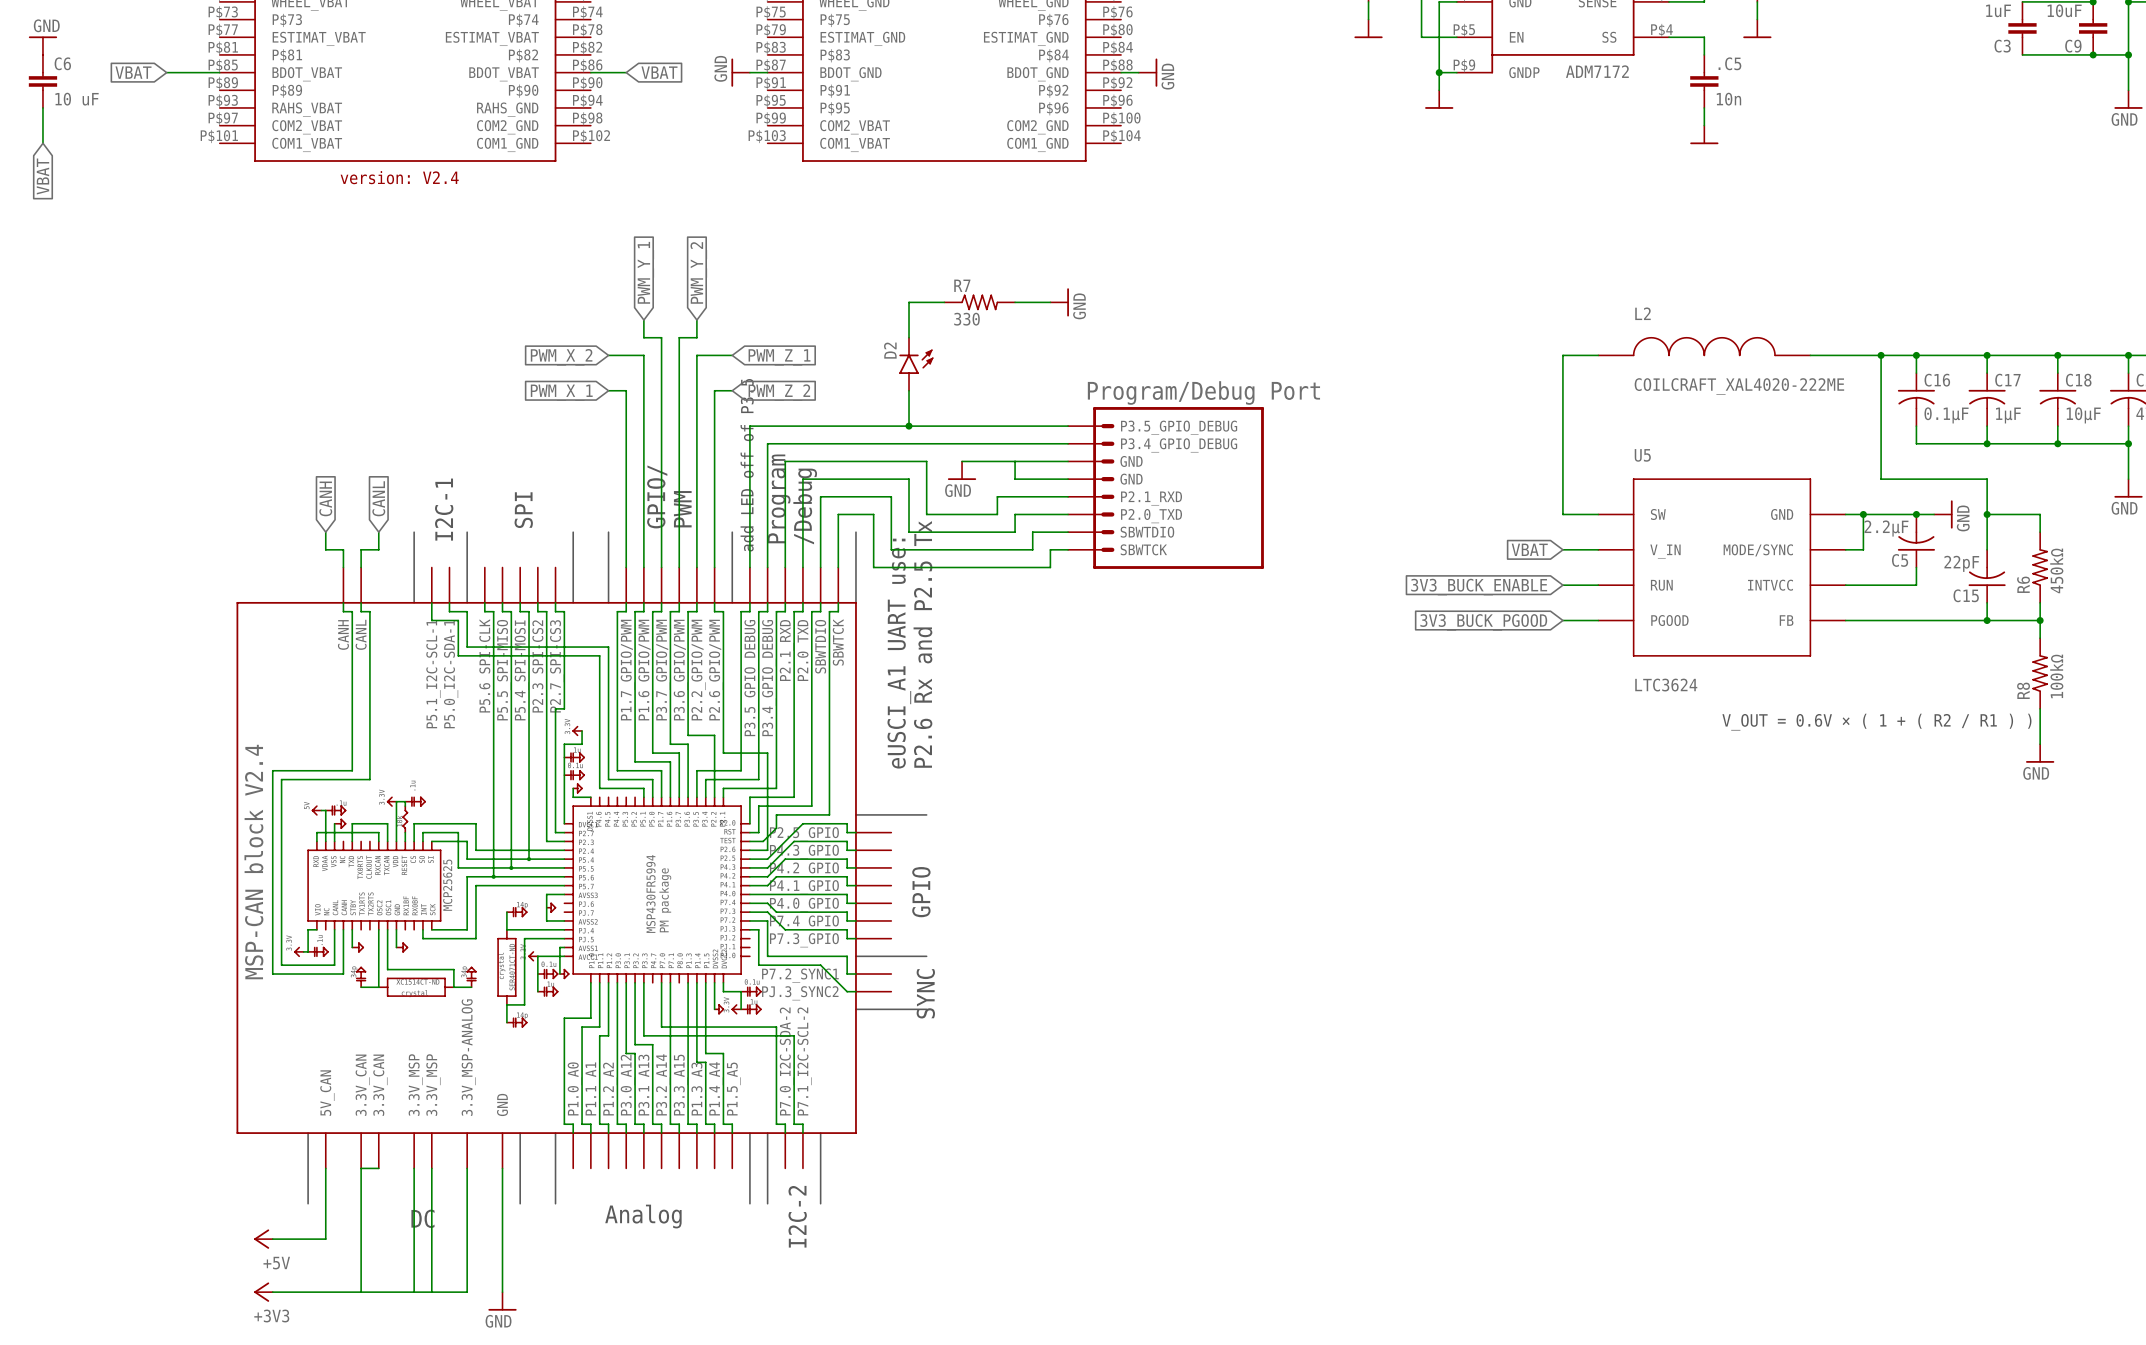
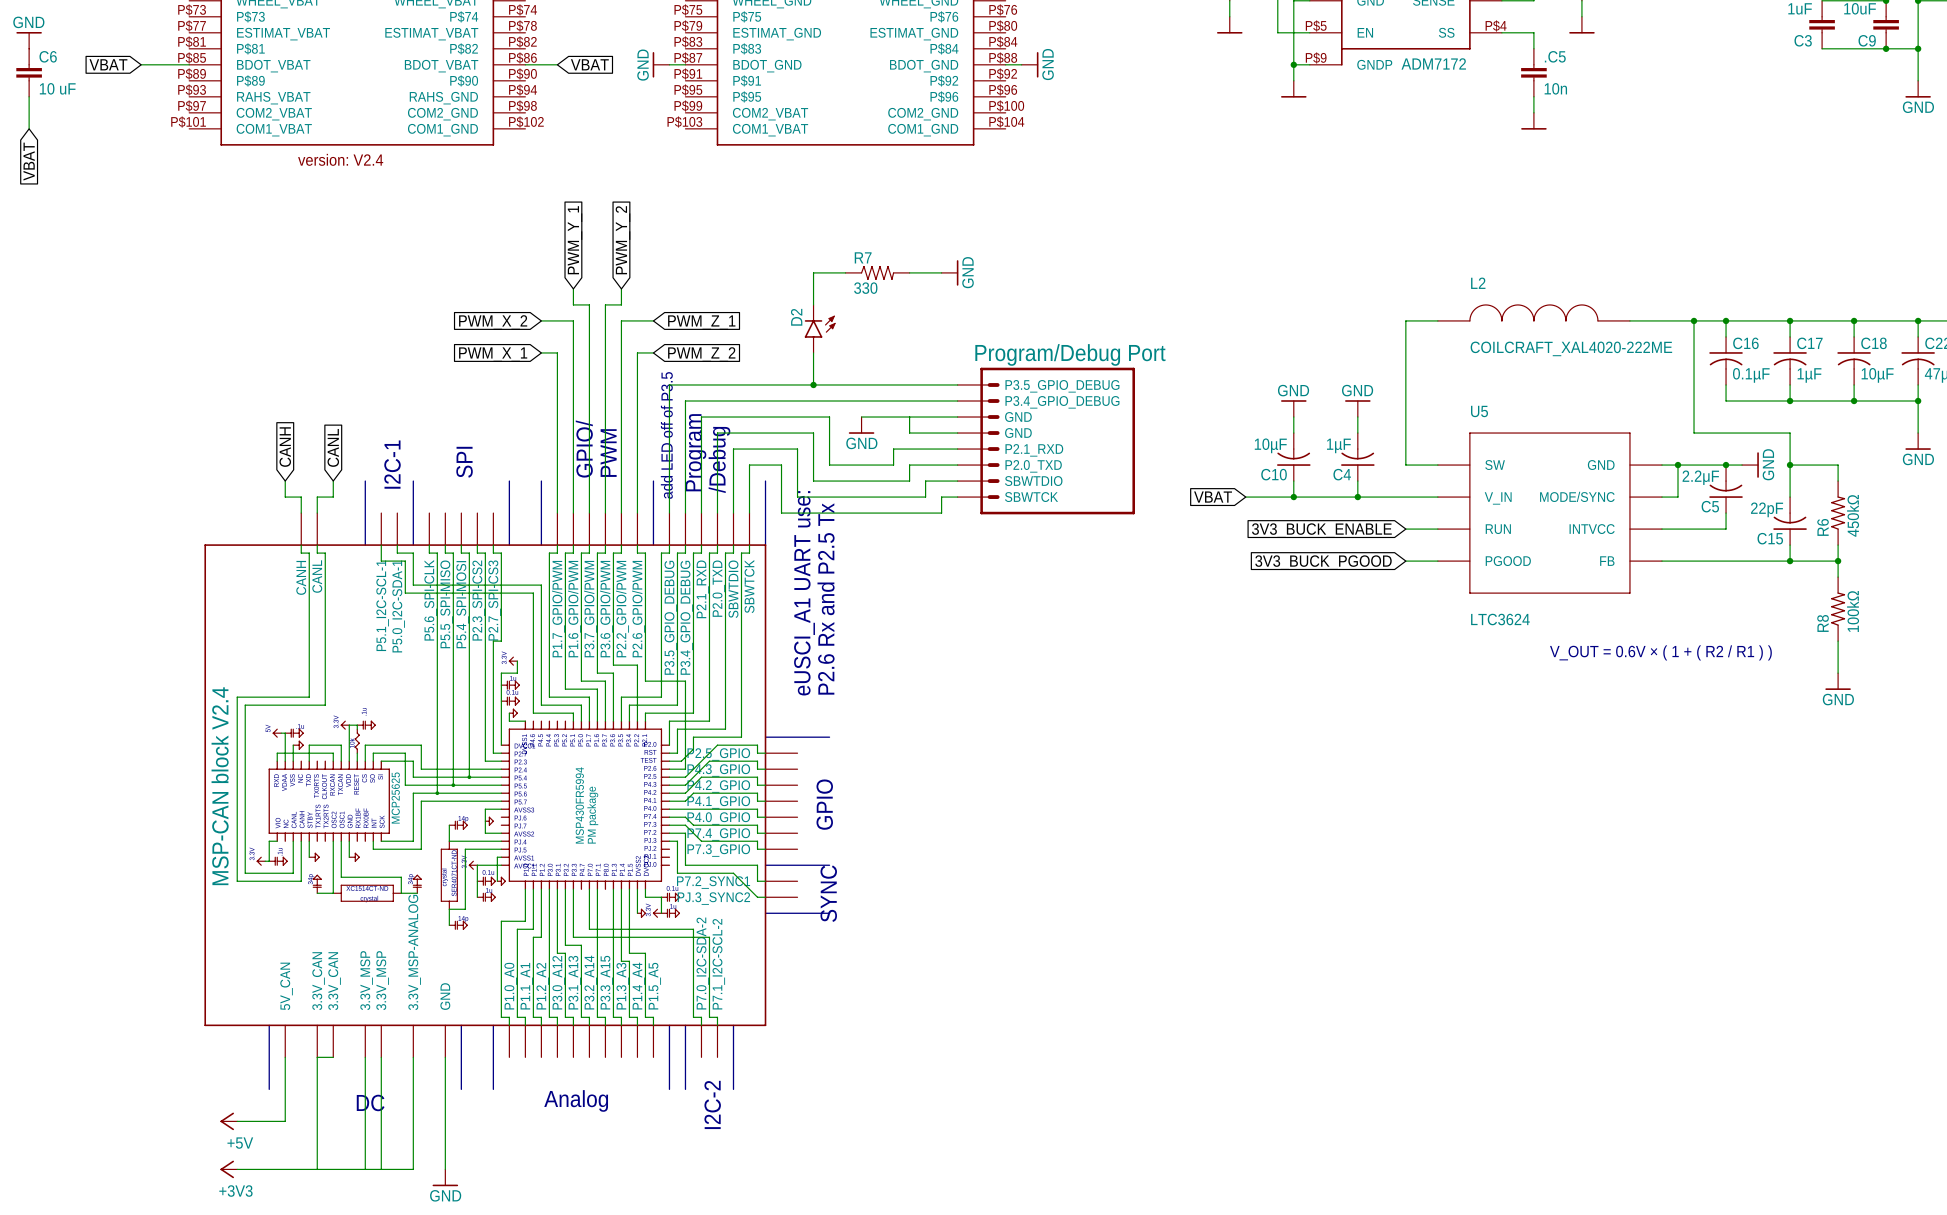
power symbol: none -> GND (1293, 408)
power symbol: none -> GND (1357, 408)
wire: none -> (1293, 417) (1293, 433)
wire: none -> (1357, 417) (1357, 433)
C10: none -> 10µF (1293, 457)
C4: none -> 1µF (1357, 457)
wire: none -> (1293, 481) (1293, 497)
wire: none -> (1357, 481) (1357, 497)
global label: none -> VBAT (1213, 497)
wire: none -> (1245, 497) (1405, 497)
junction: none -> (1293, 497)
junction: none -> (1357, 497)
global label: VBAT (1529, 549) -> none

